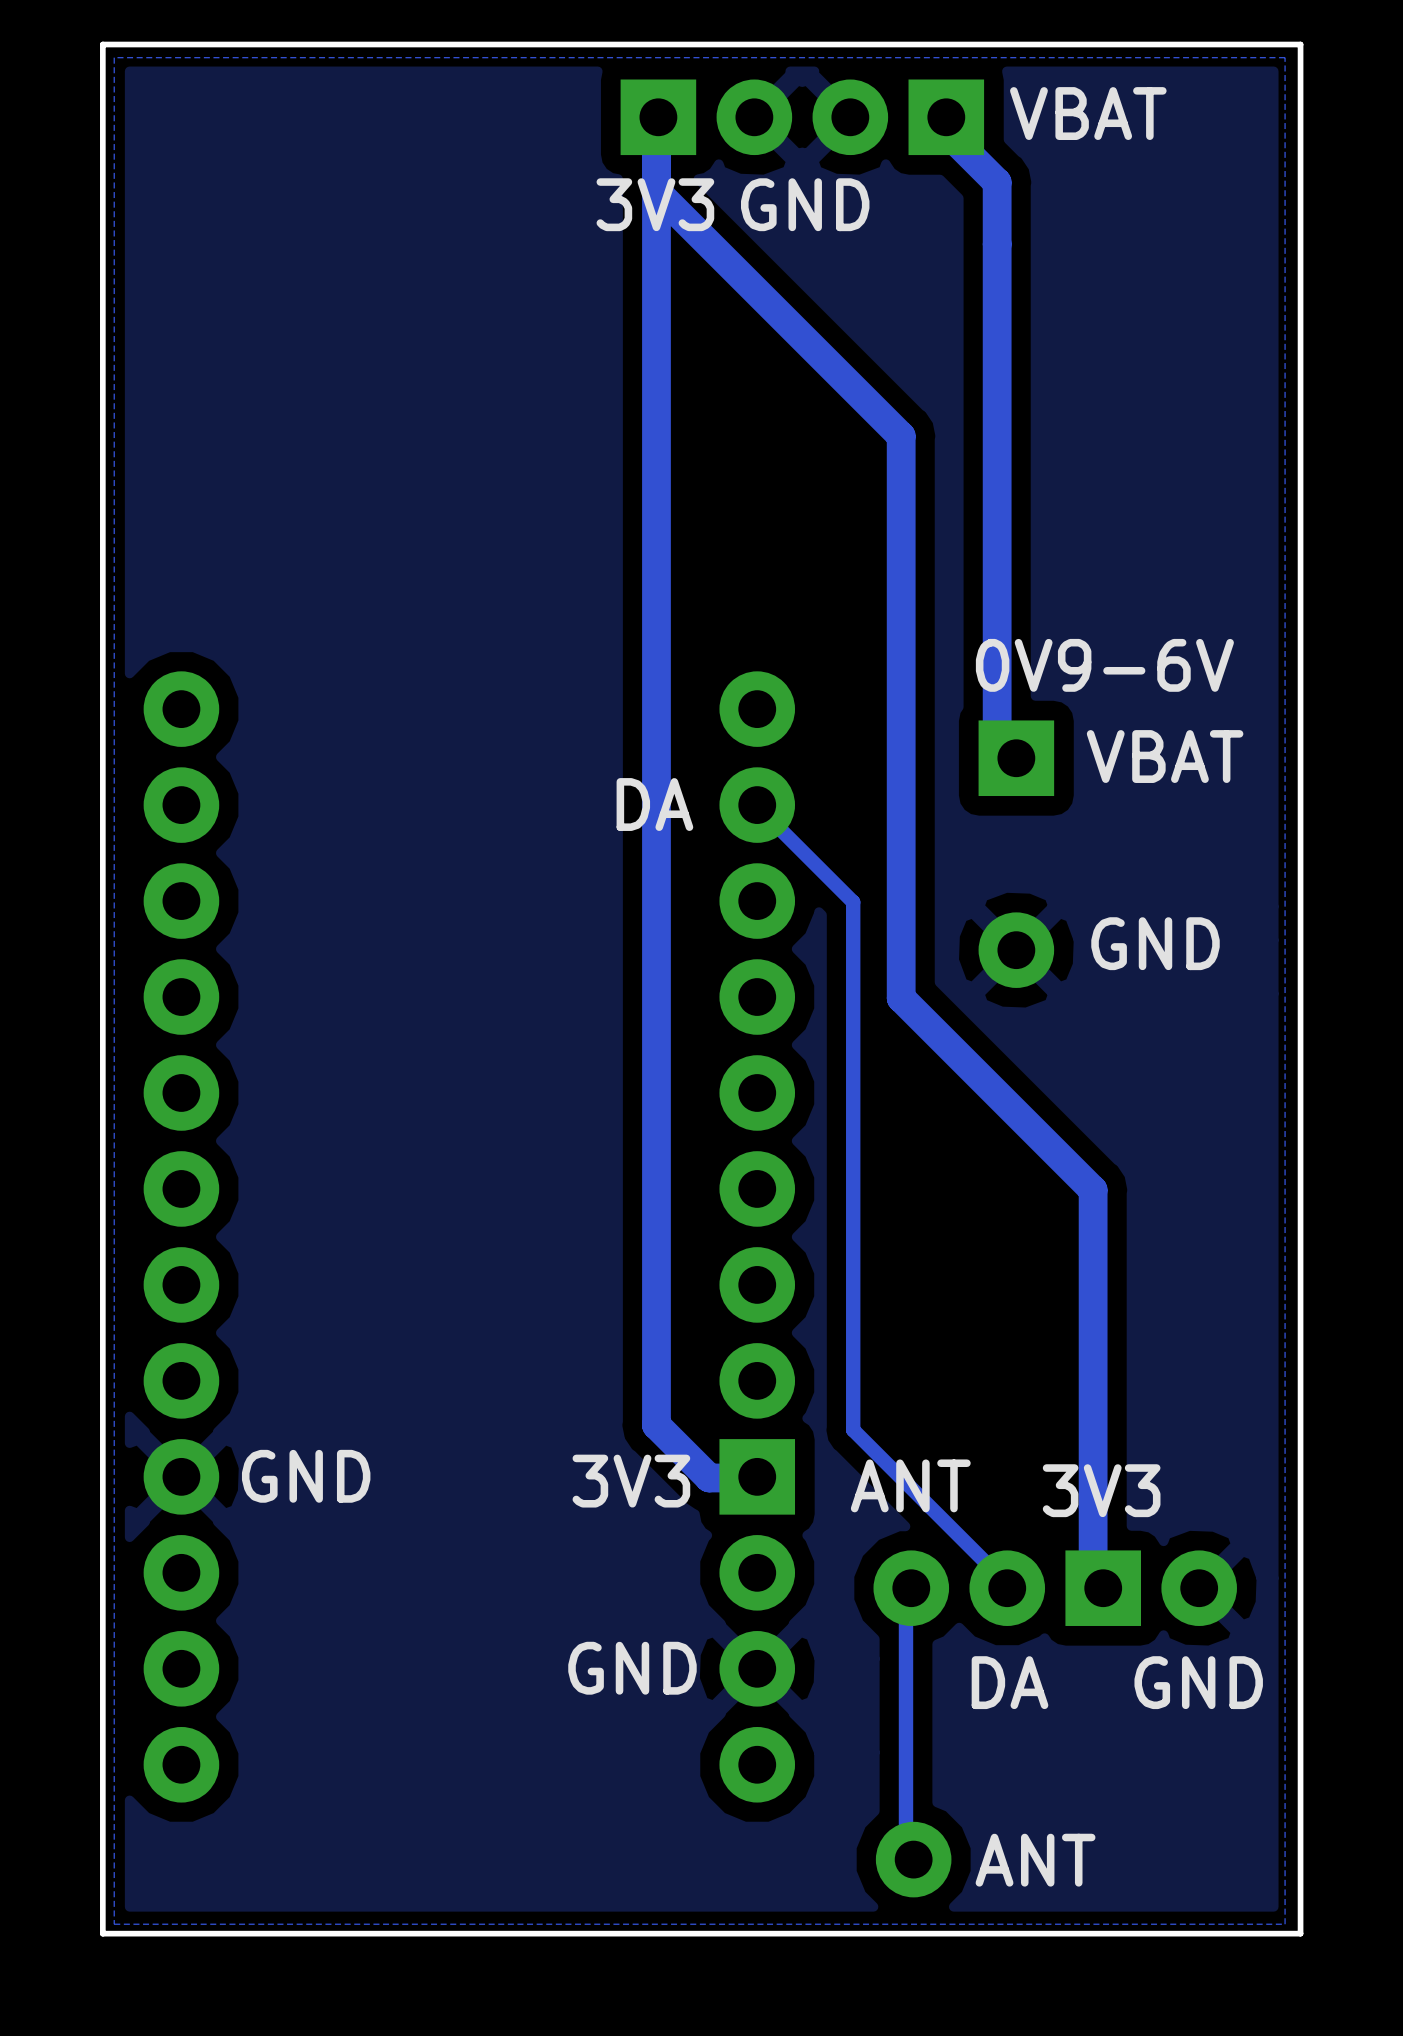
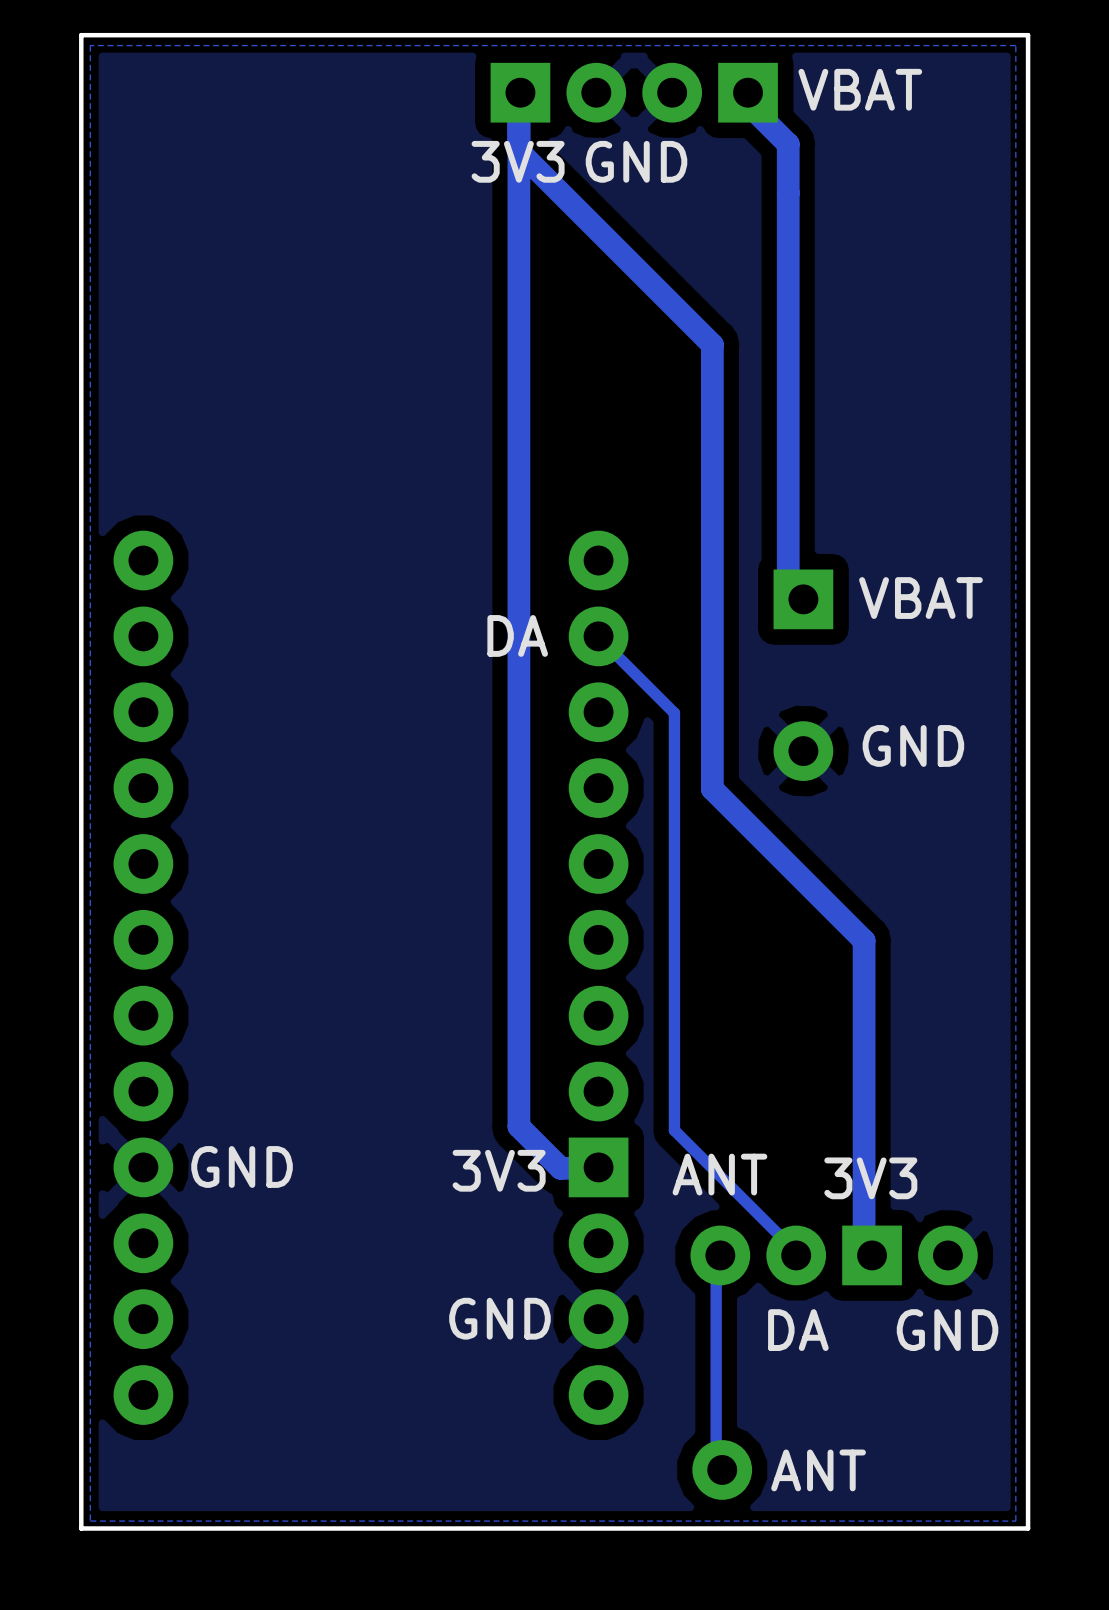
text: 0V9-6V (1104, 665) -> none

